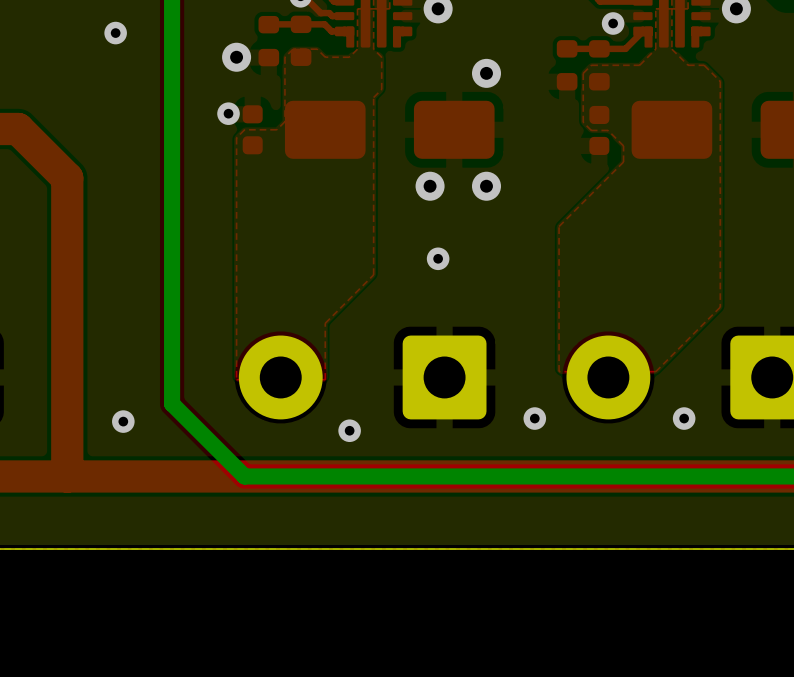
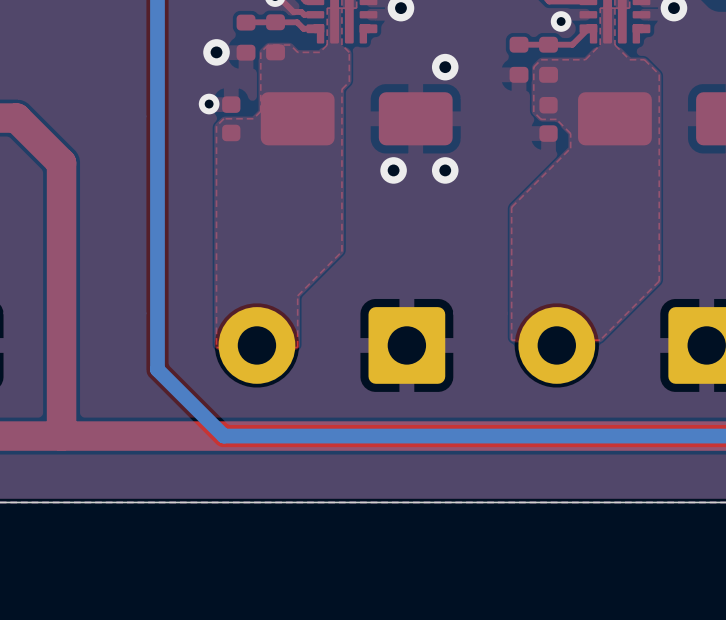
via: (115, 33) -> none
via: (438, 258) -> none
via: (534, 418) -> none
via: (684, 418) -> none
via: (123, 421) -> none
via: (349, 430) -> none

